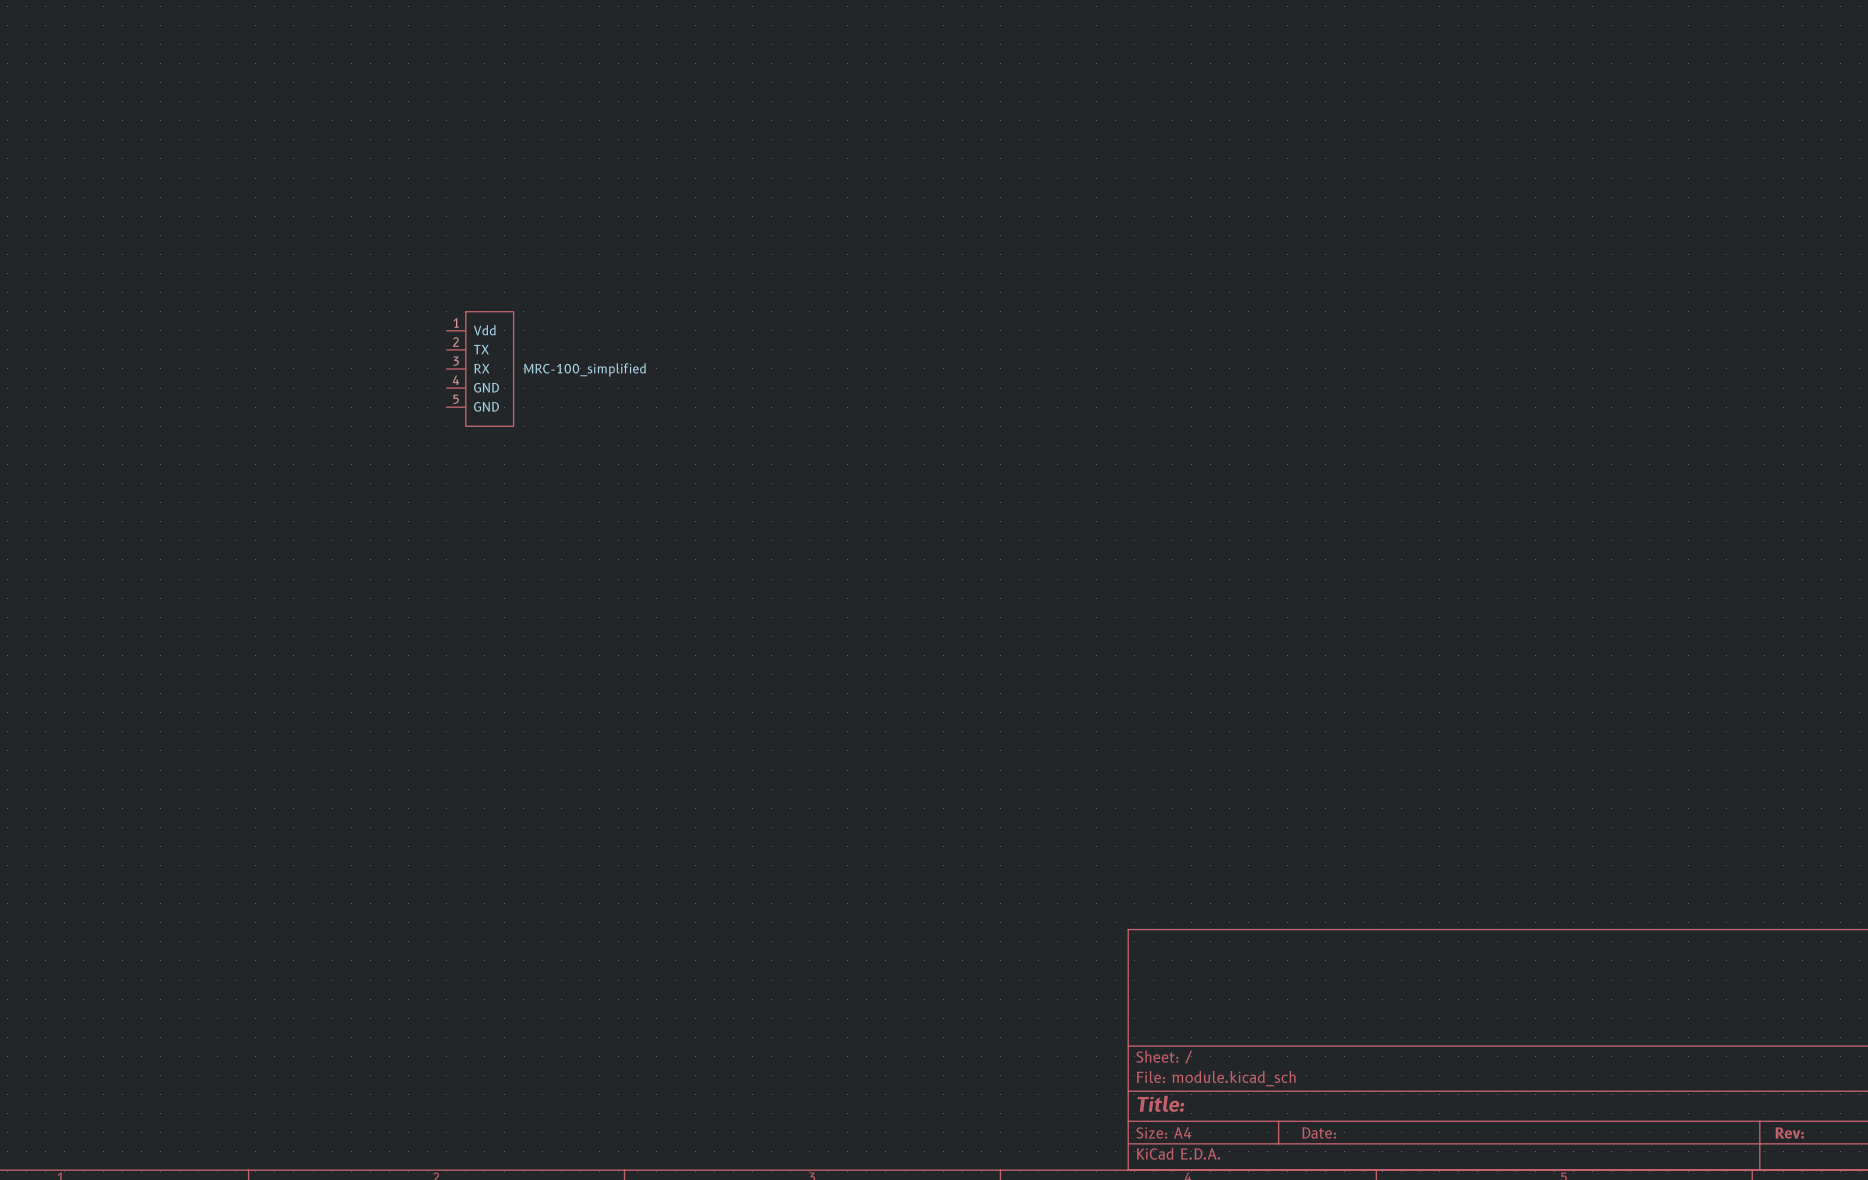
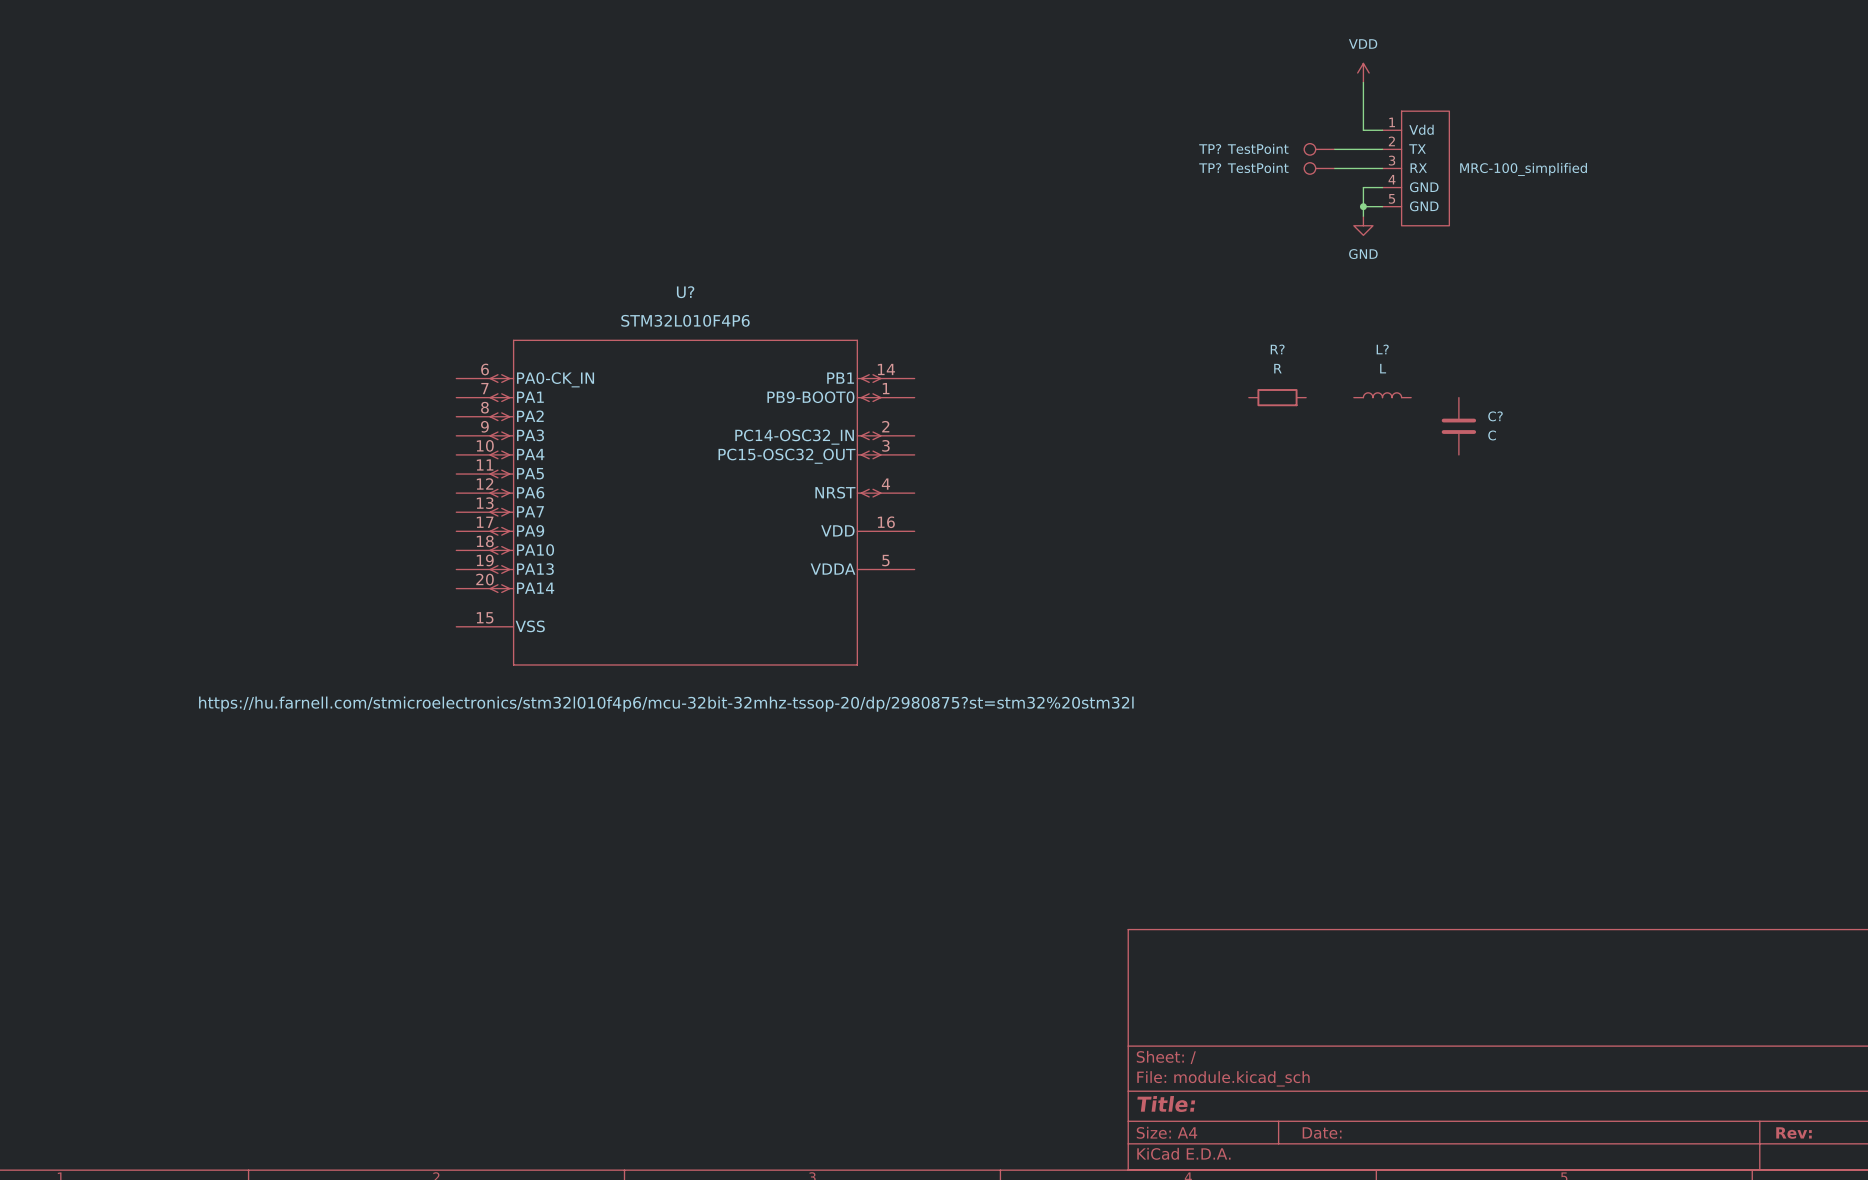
power symbol: none -> VDD (1363, 72)
wire: none -> (1363, 82) (1363, 130) (1382, 130)
TP?: none -> TestPoint (1319, 149)
wire: none -> (1334, 149) (1382, 149)
TP?: none -> TestPoint (1319, 168)
wire: none -> (1334, 168) (1382, 168)
part: none -> MRC-100_simplified (1415, 168)
wire: none -> (1382, 187) (1363, 187) (1363, 216)
wire: none -> (1363, 206) (1382, 206)
junction: none -> (1363, 206)
power symbol: none -> GND (1363, 225)
part: MRC-100_simplified (480, 368) -> none
L?: none -> L (1382, 395)
R?: none -> R (1277, 397)
C?: none -> C (1458, 426)
U?: none -> STM32L010F4P6 (685, 502)

